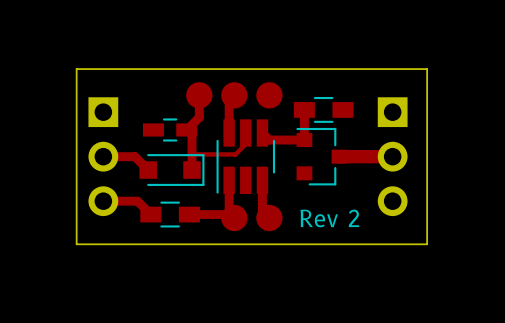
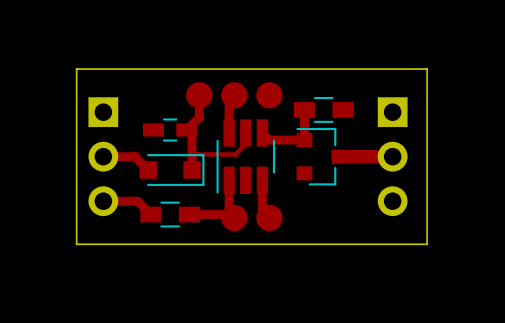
text: Rev 2 (329, 218) -> none

